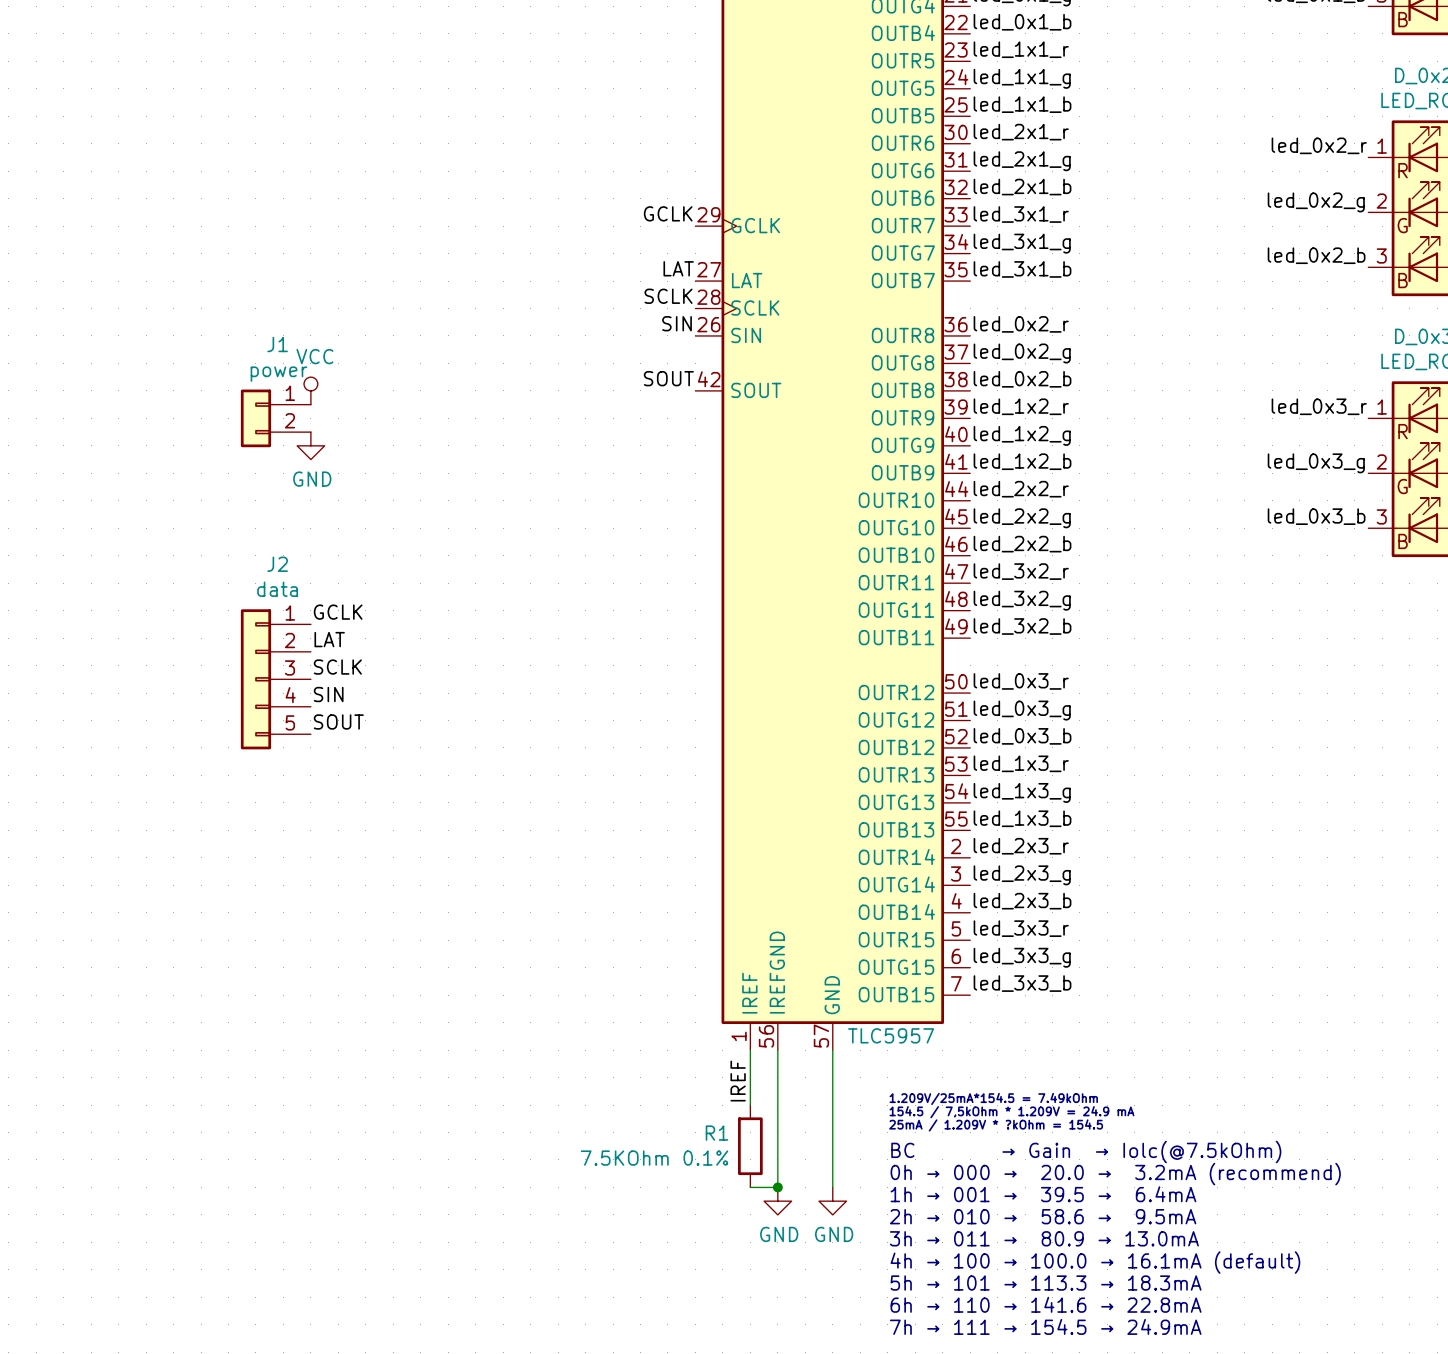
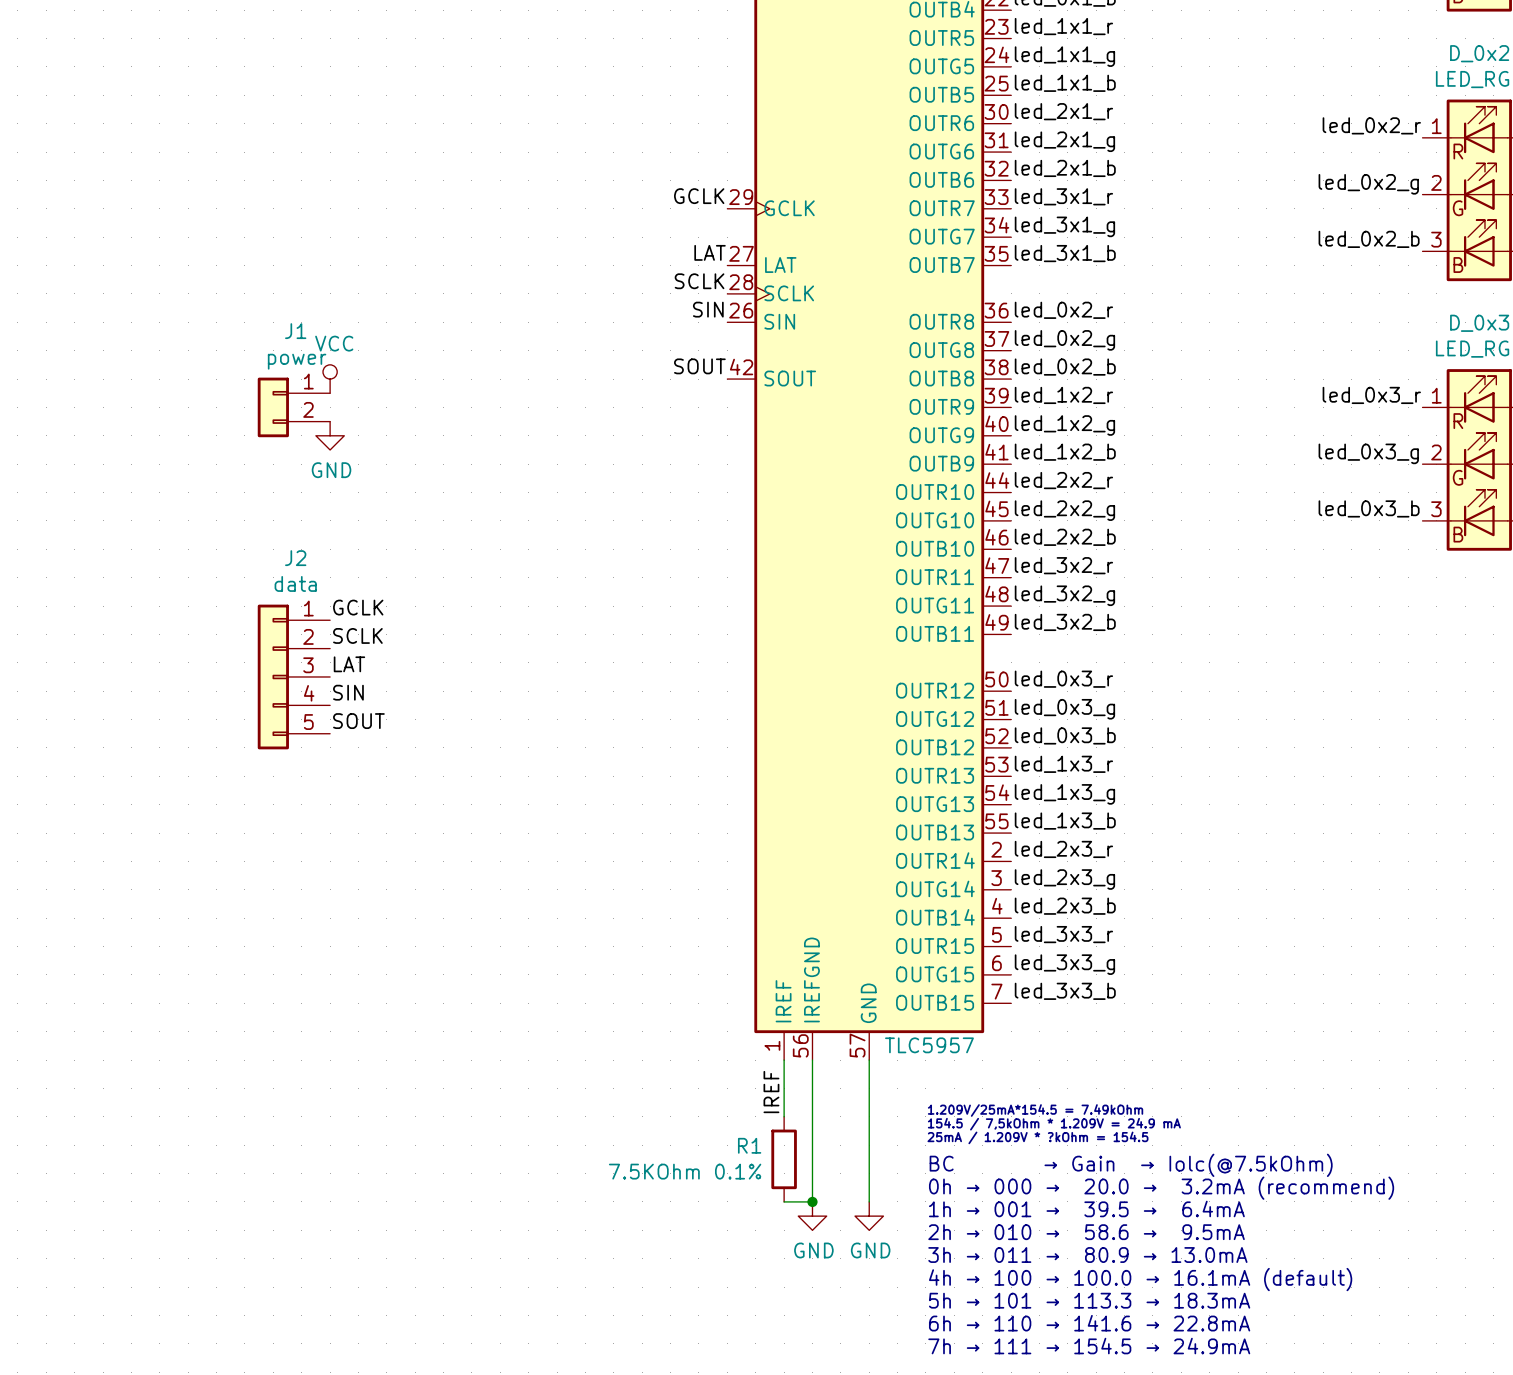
label: LAT (329, 639) -> SCLK (357, 635)
label: SCLK (337, 667) -> LAT (349, 664)

